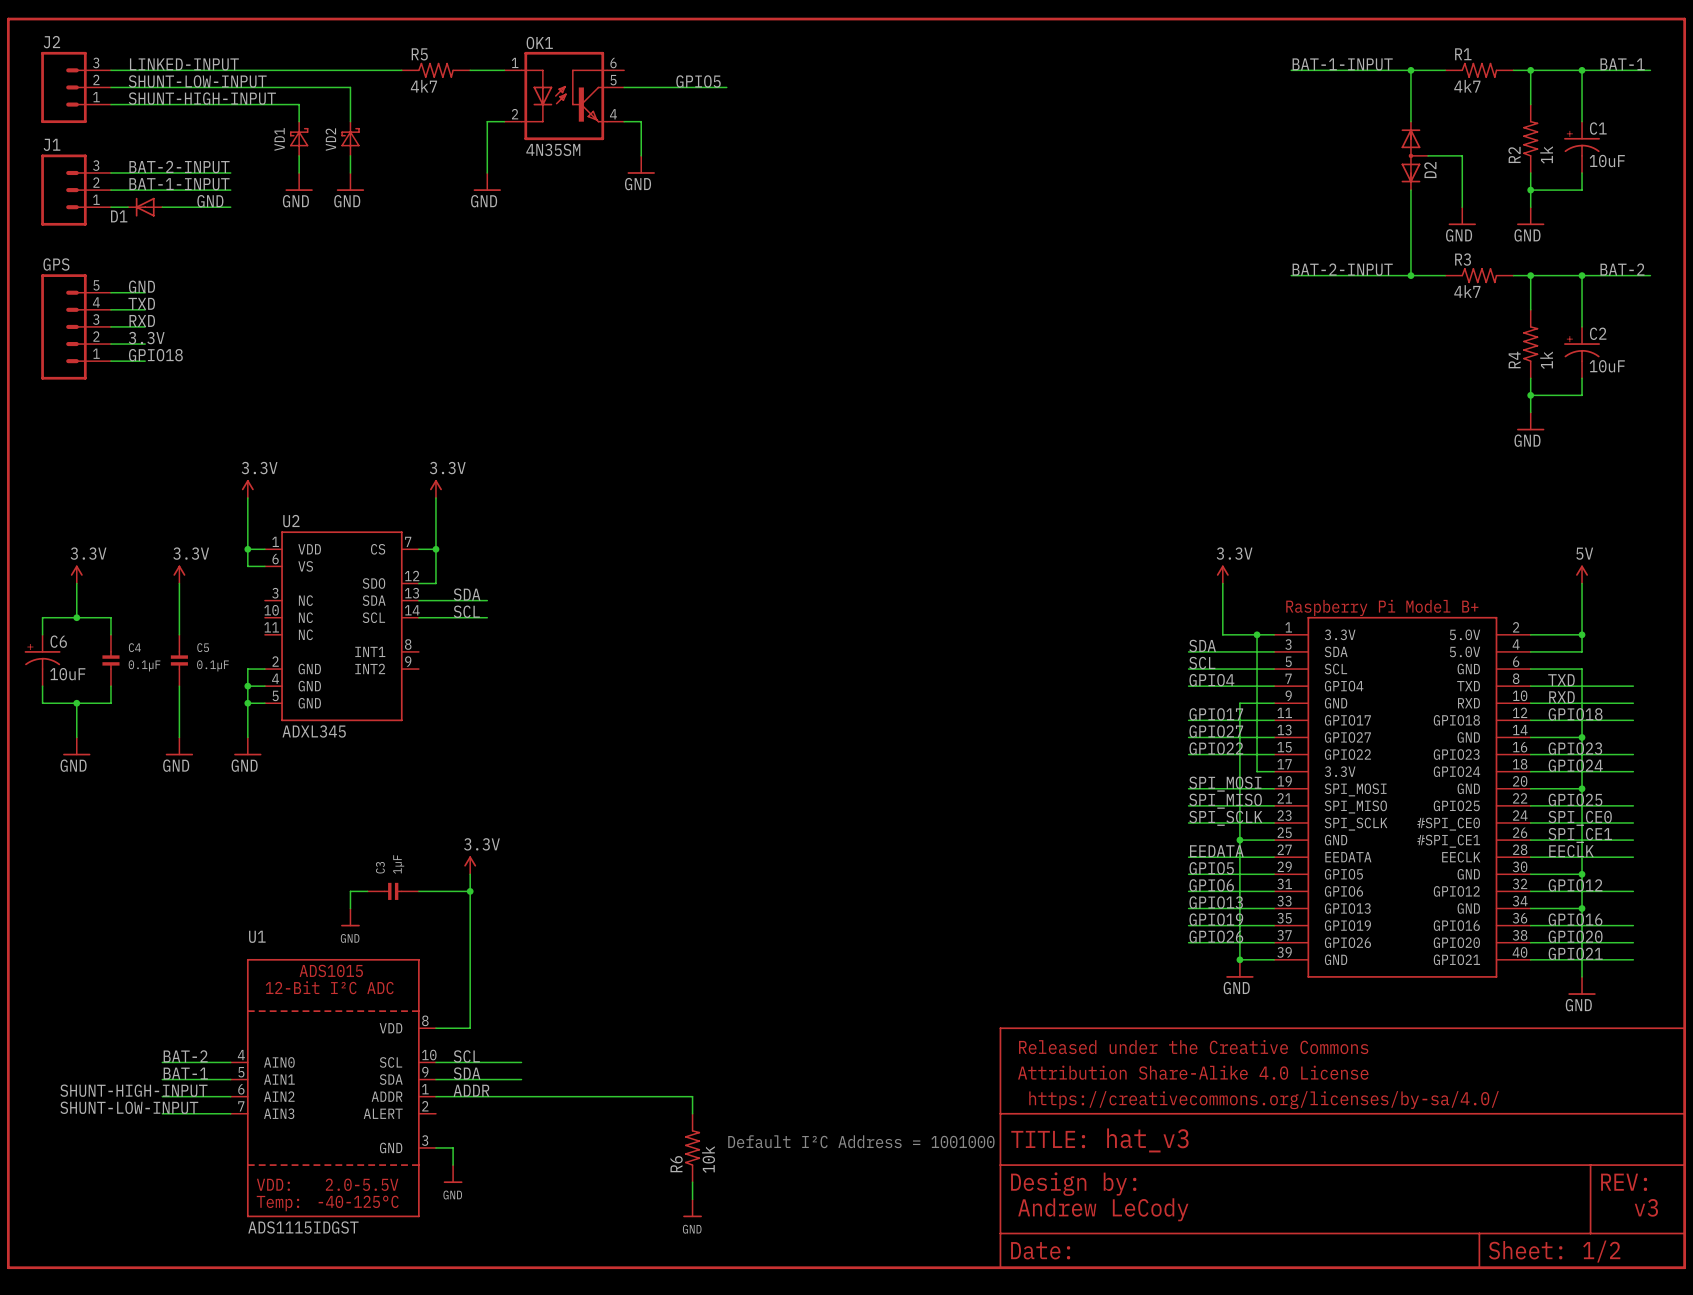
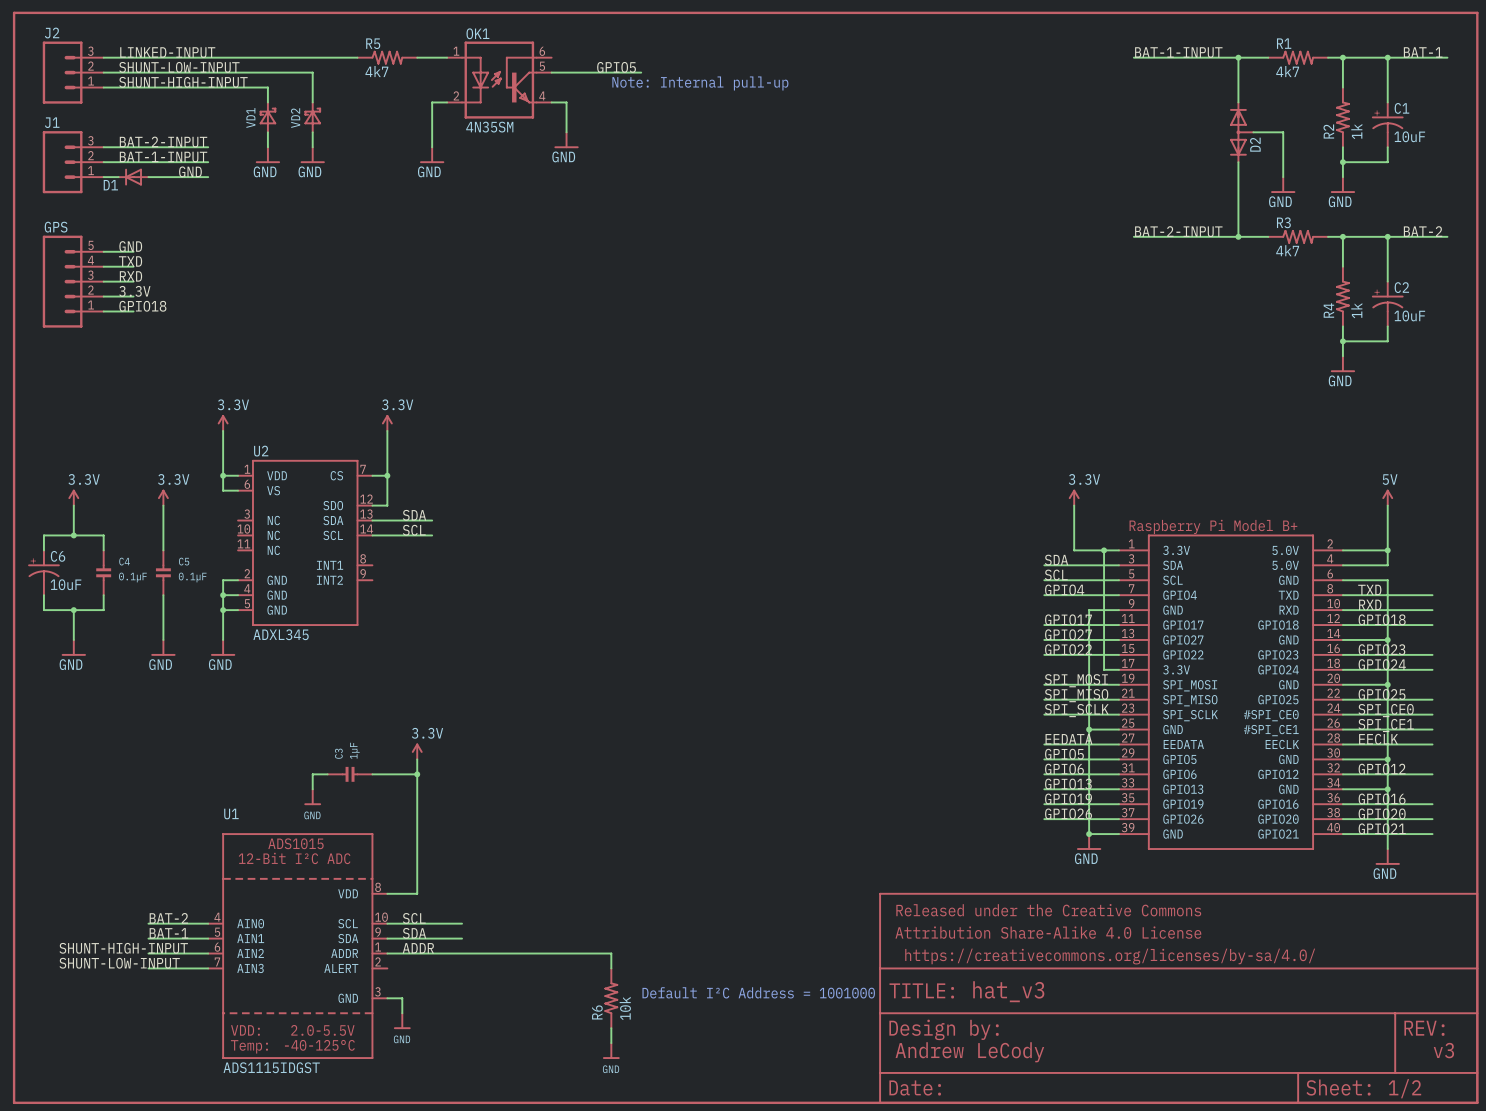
text: none -> Note: Internal pull-up (700, 83)

